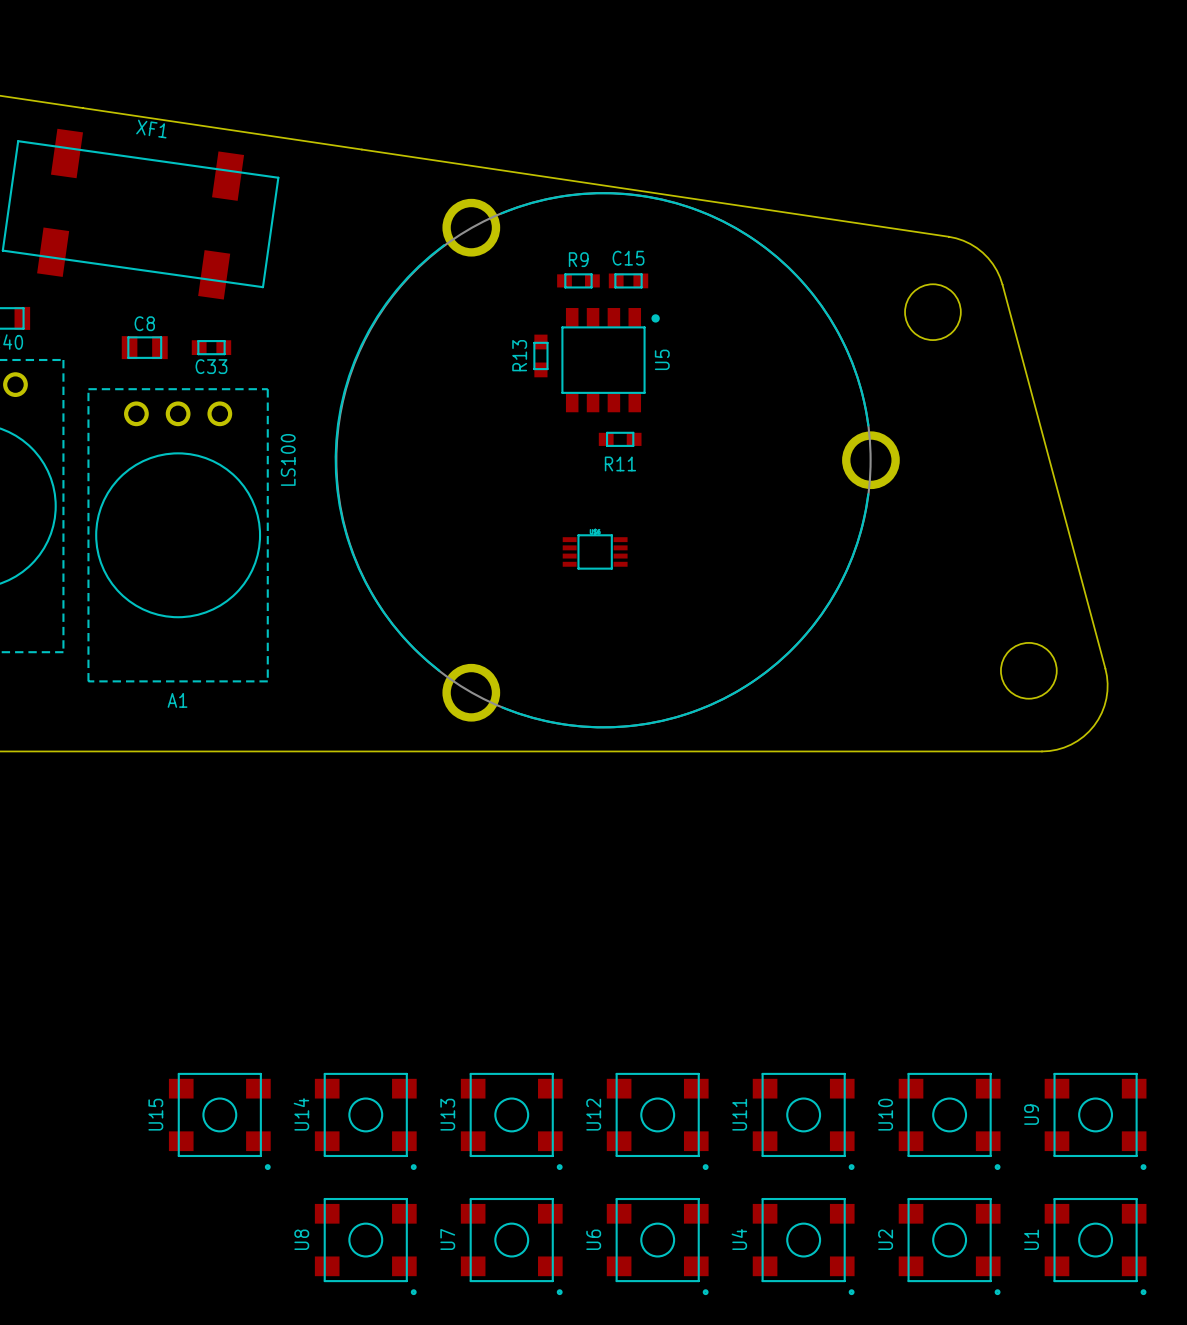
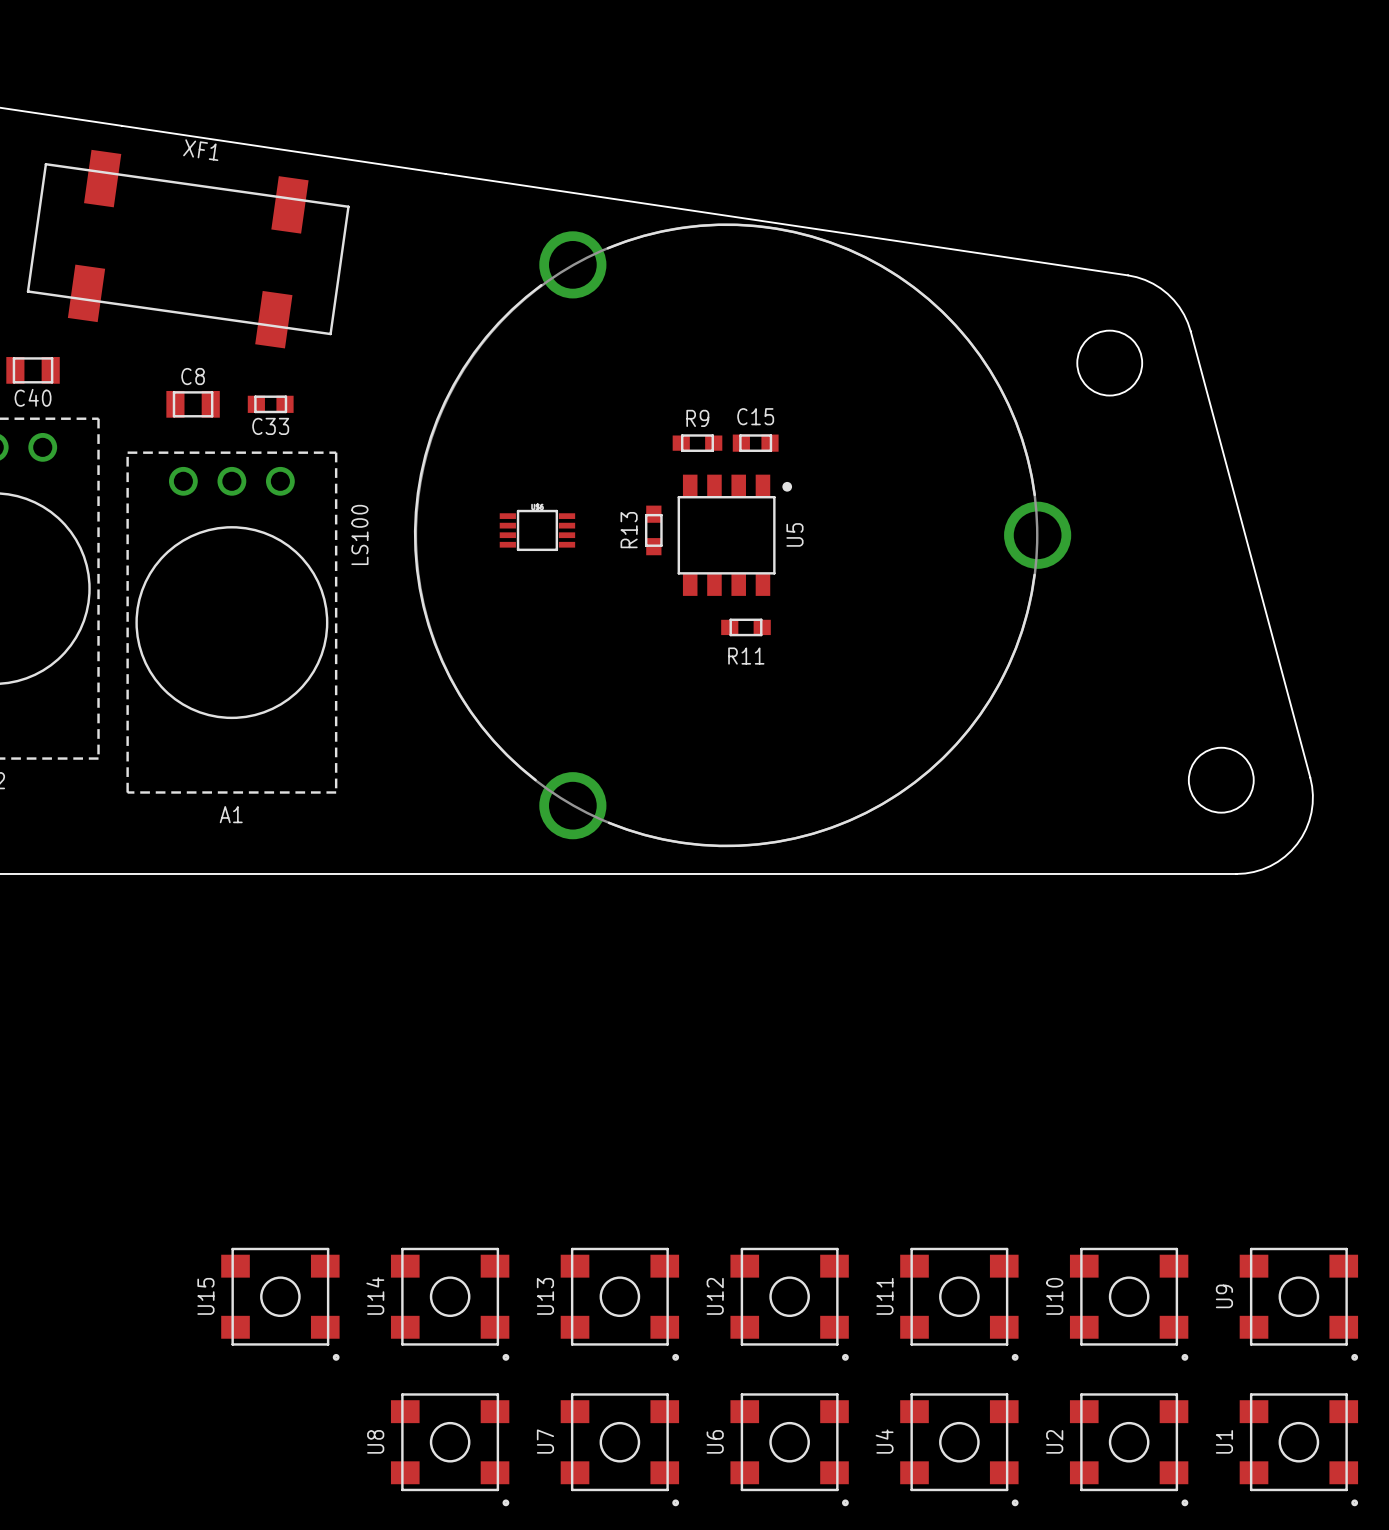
R9 position: (578, 280) -> (697, 443)
C15 position: (628, 280) -> (755, 443)
R13 position: (540, 355) -> (653, 530)
U5 position: (610, 360) -> (734, 535)
R11 position: (620, 439) -> (745, 627)
part position: (595, 551) -> (537, 530)

